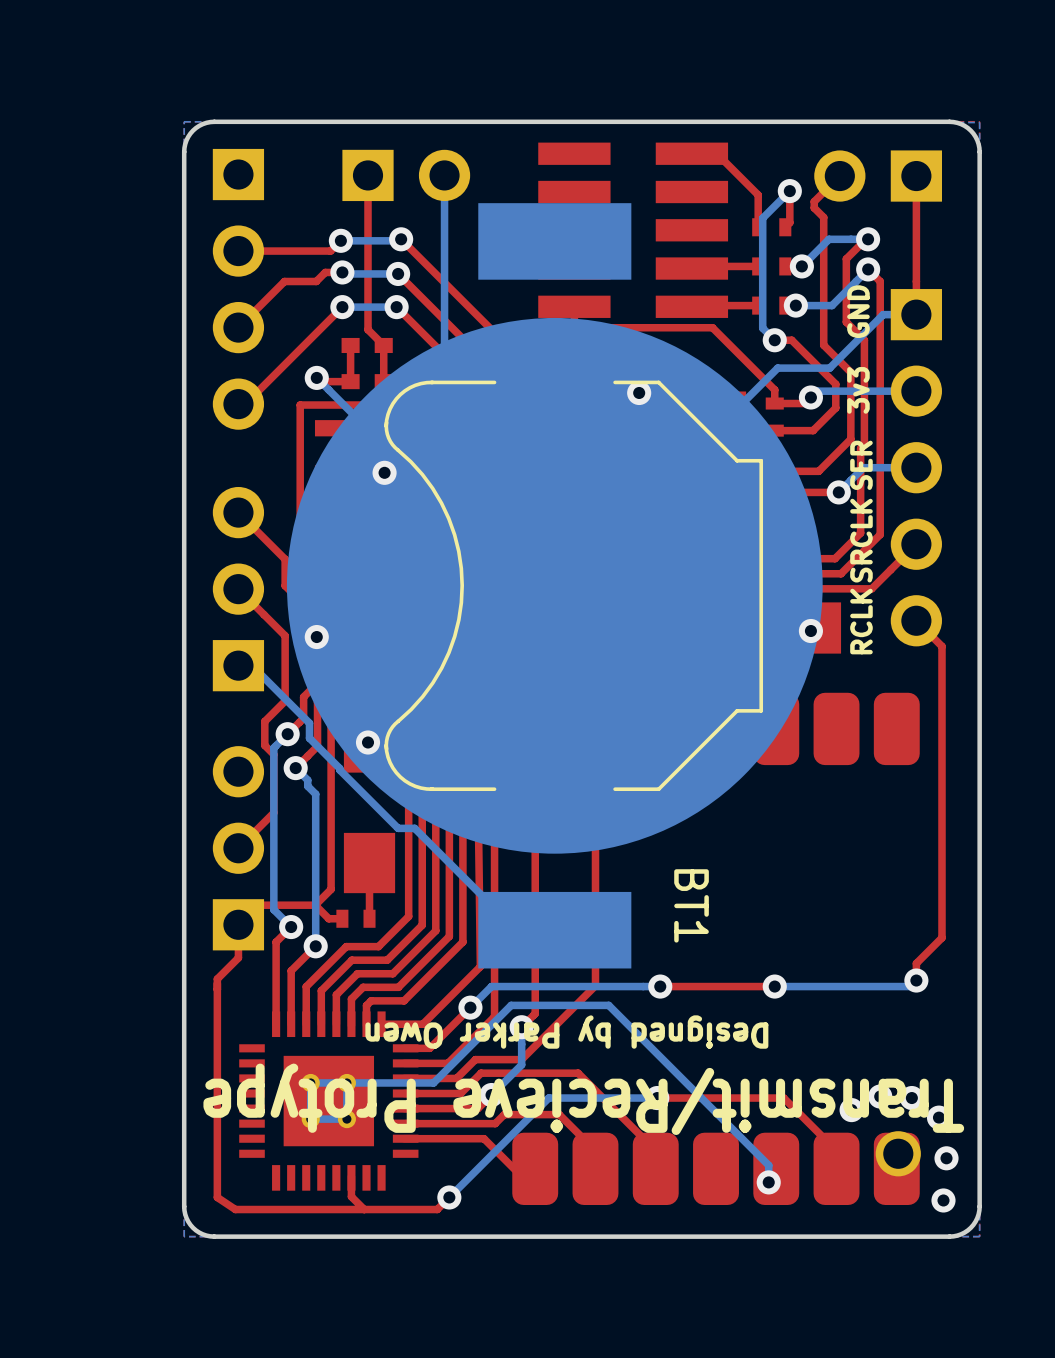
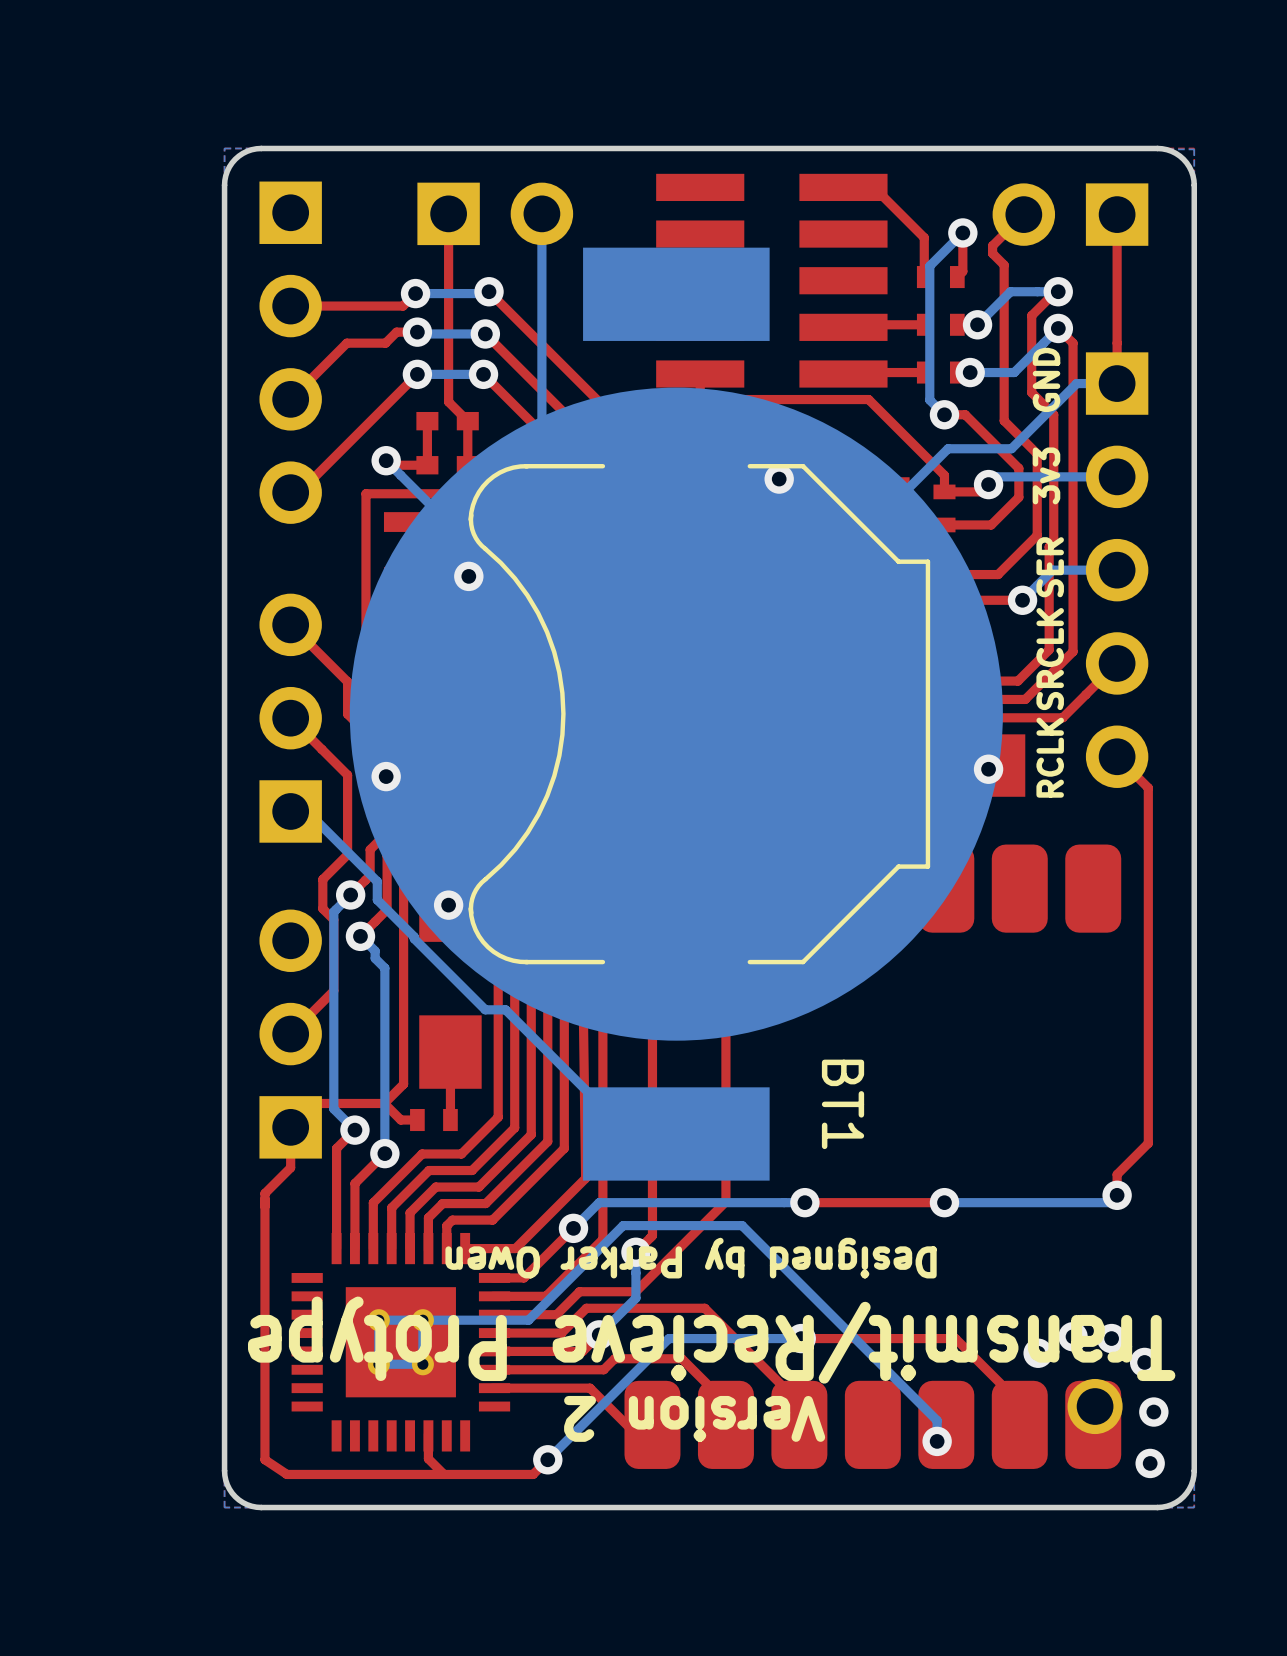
text: none -> Version 2 (694, 1418)

